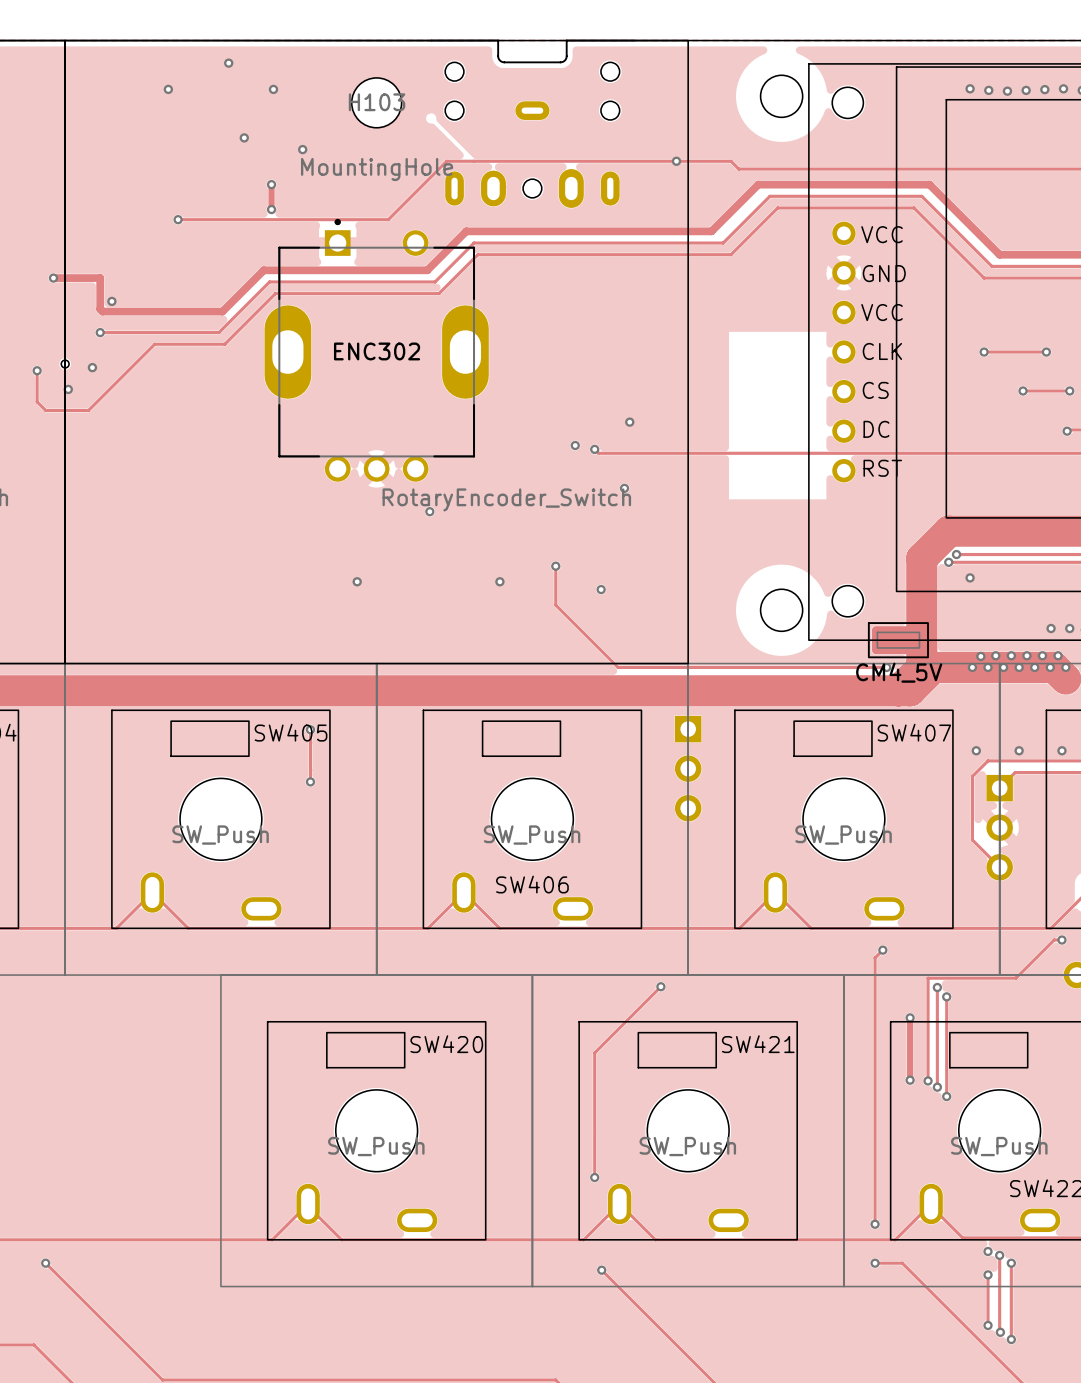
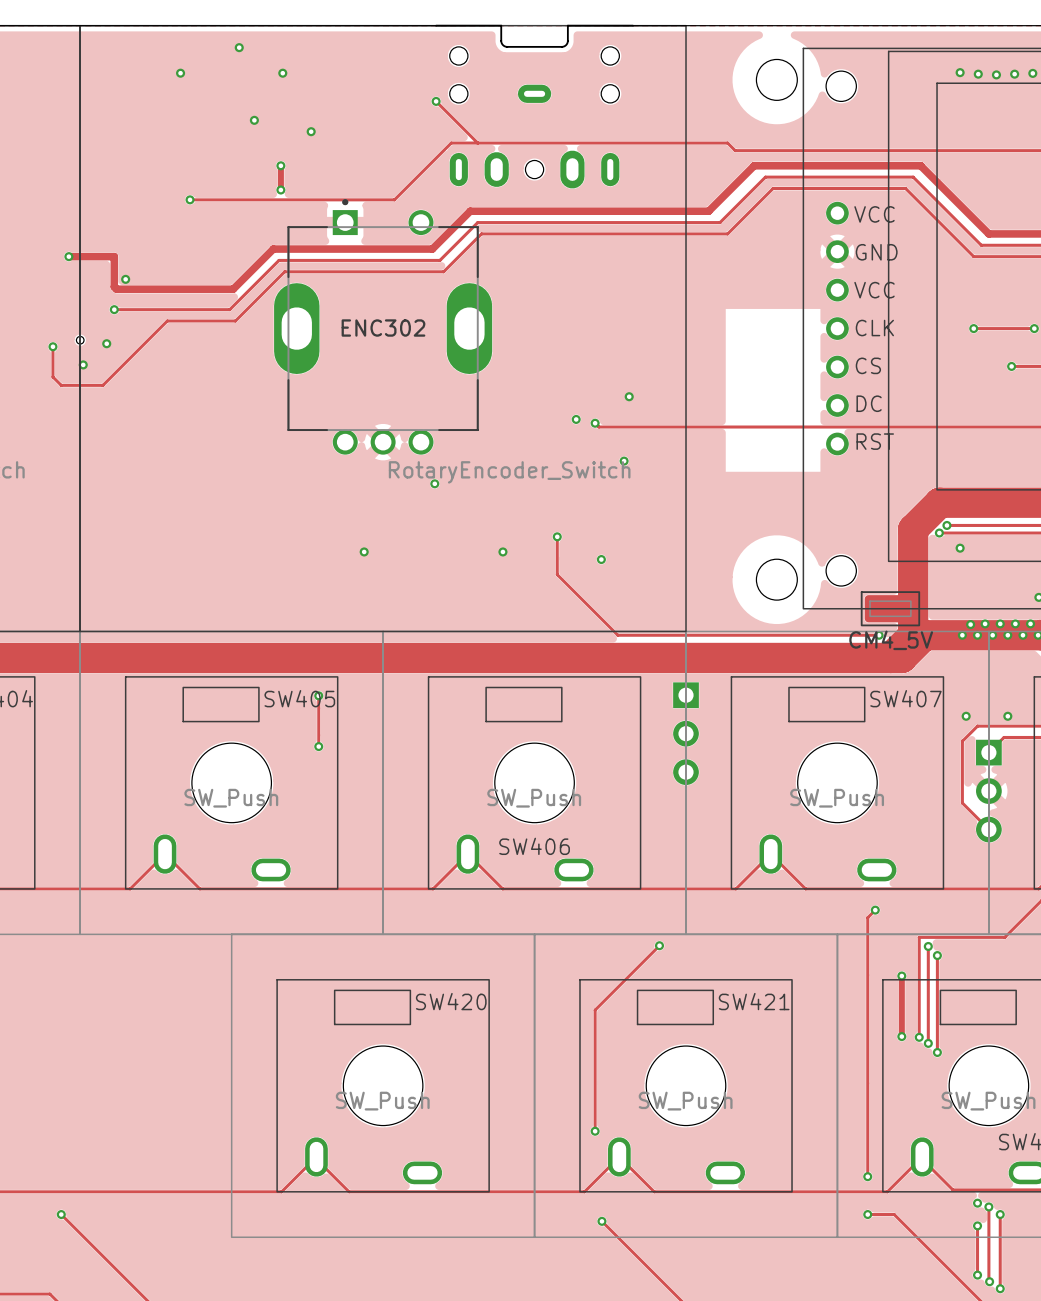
H103: MountingHole (376, 102) -> none
track: none -> (436, 101) (477, 143)
via: none -> (436, 101)
via: (676, 161) -> none

